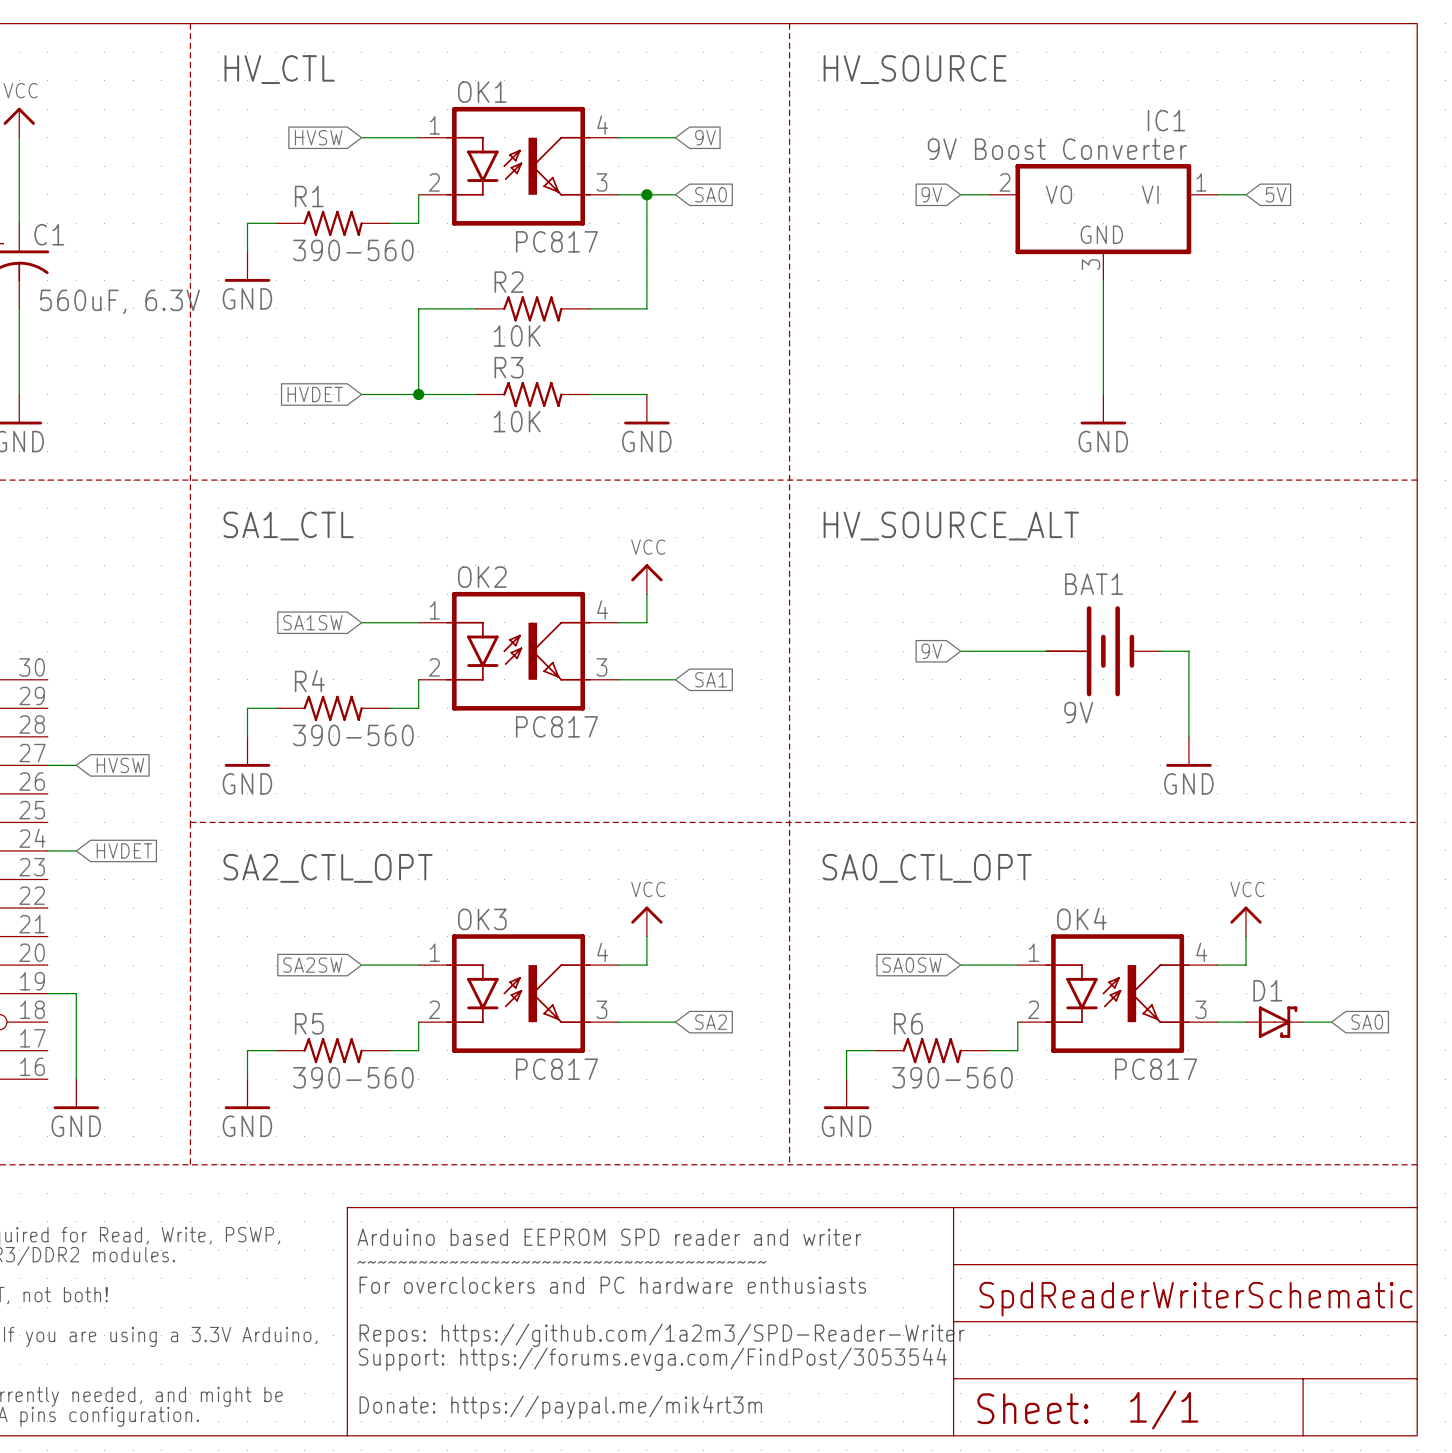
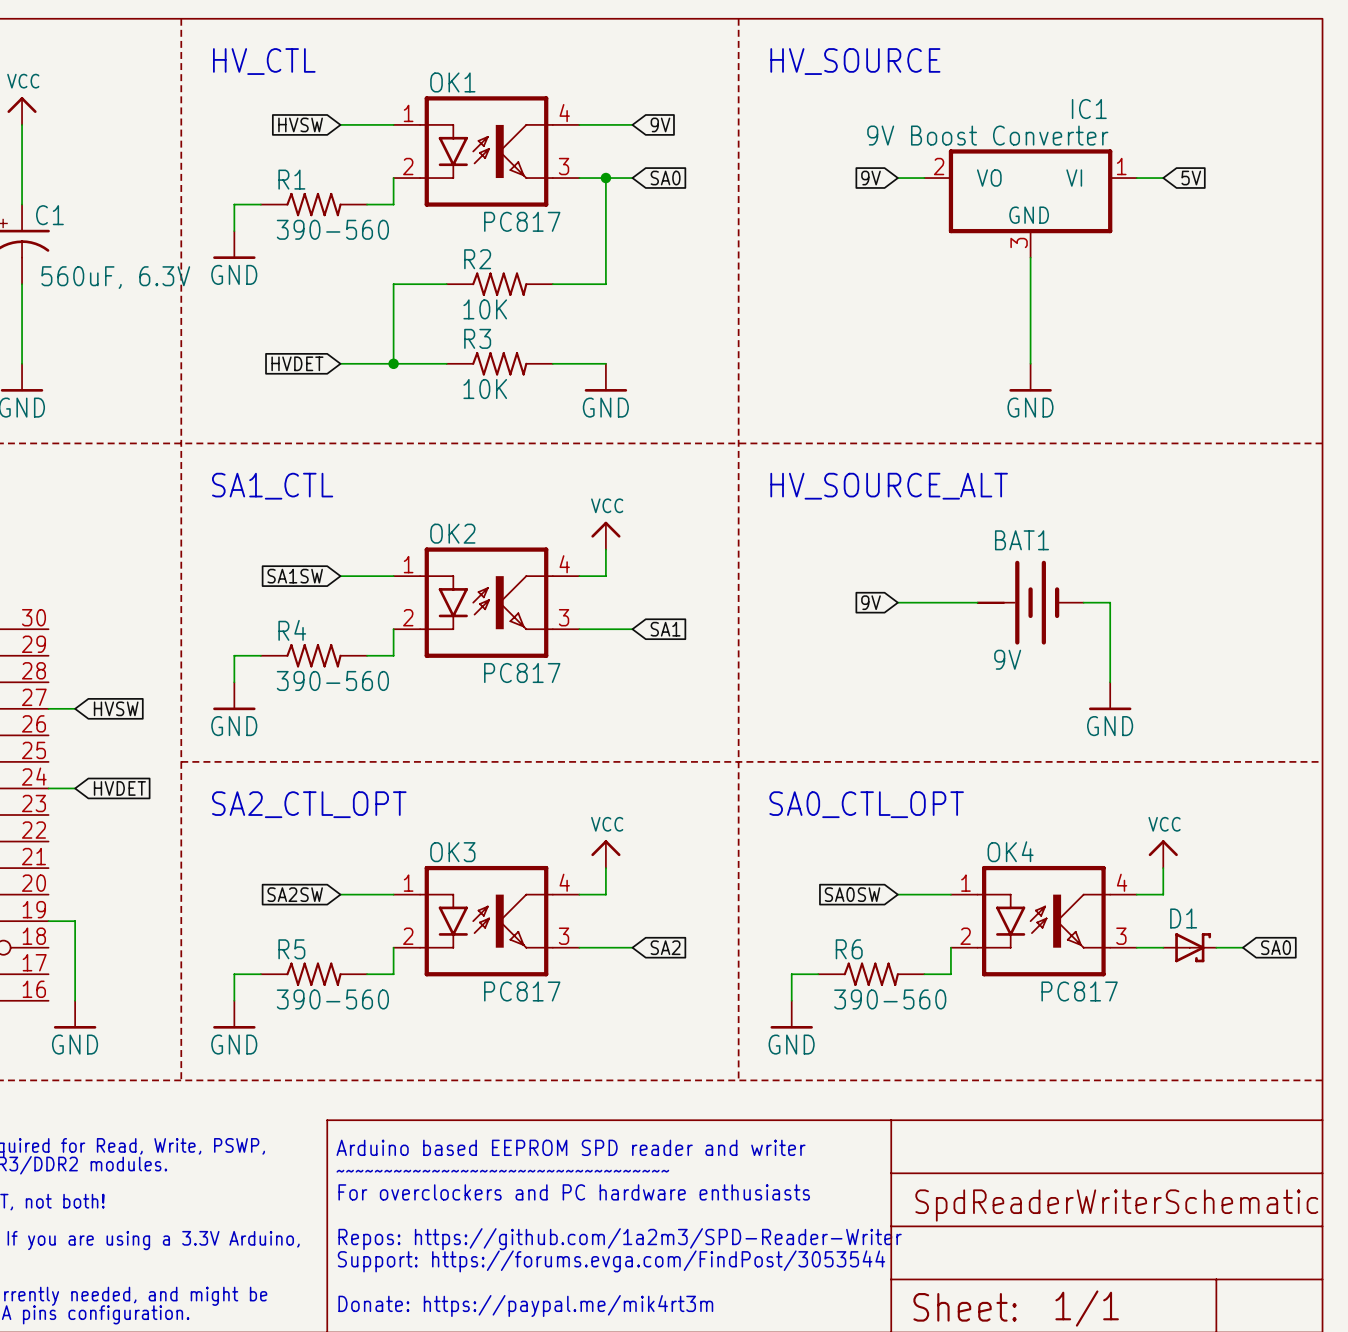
text: ~~~~~~~~~~~~~~~~~~~~~~~~~~~~~~~~~~~~~~~~ (561, 1262) -> ~~~~~~~~~~~~~~~~~~~~~~~~~~~~~~~~~~~ (502, 1171)

